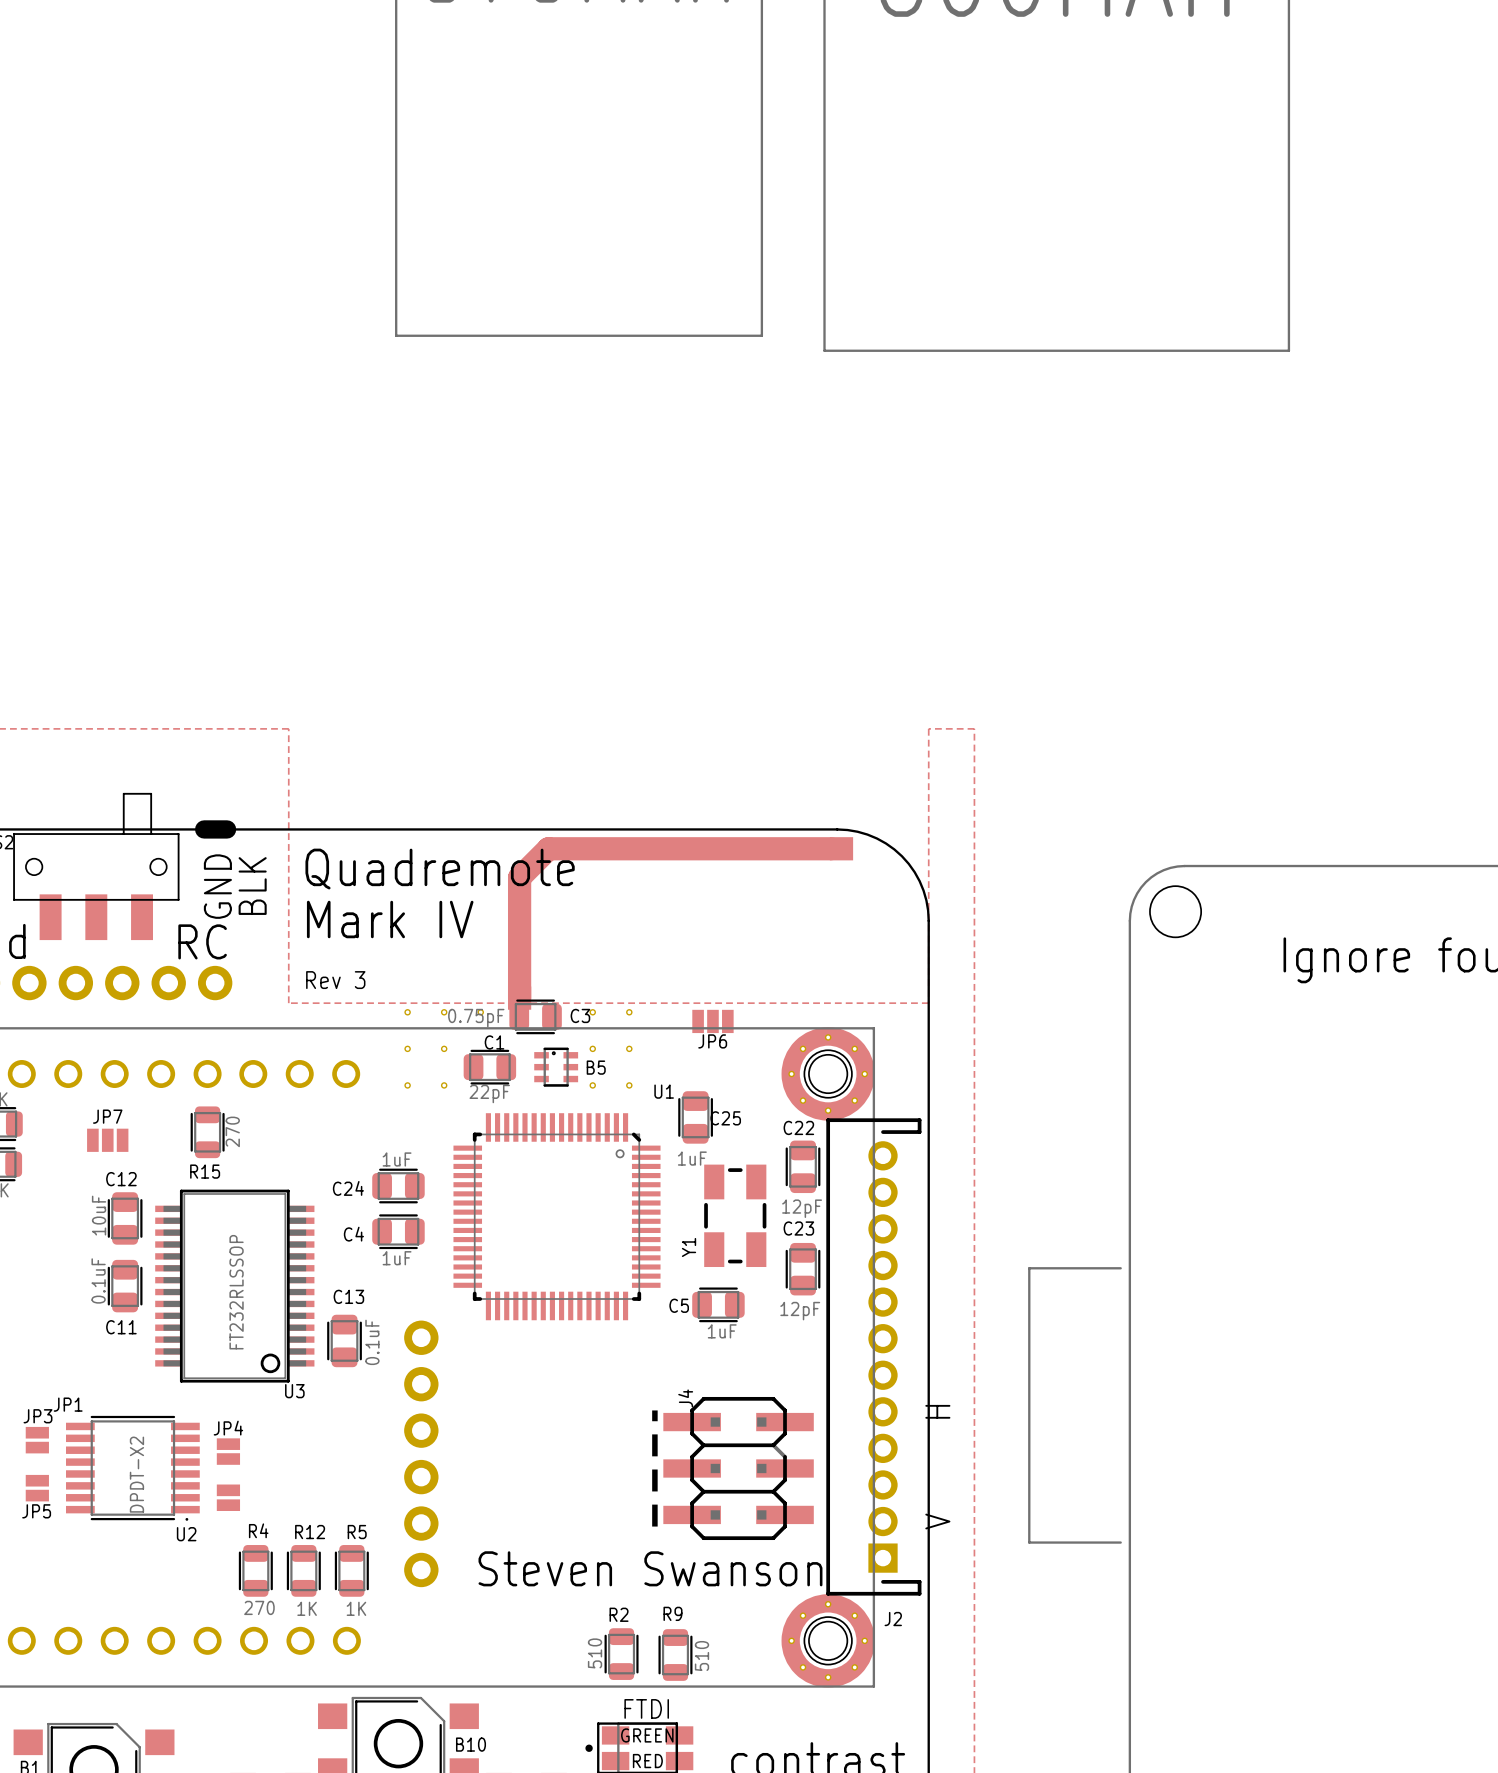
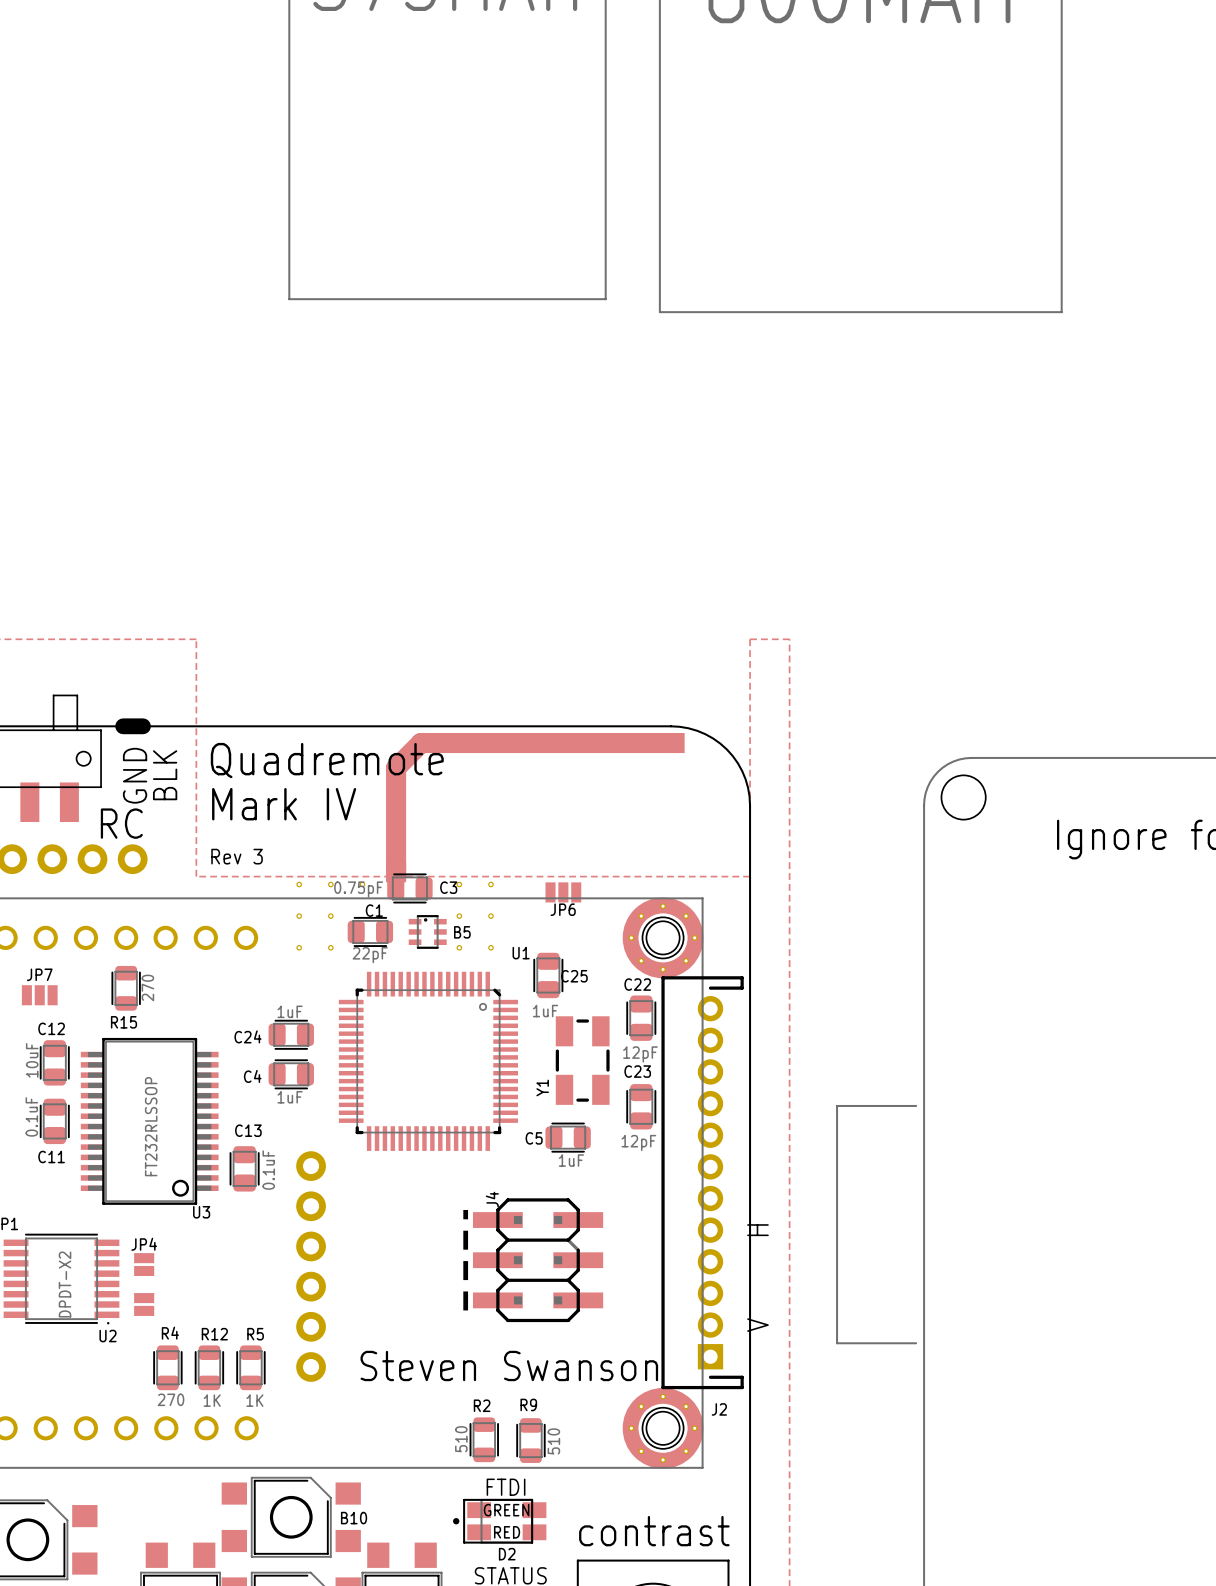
J4 position: (732, 1468) -> (533, 1260)

